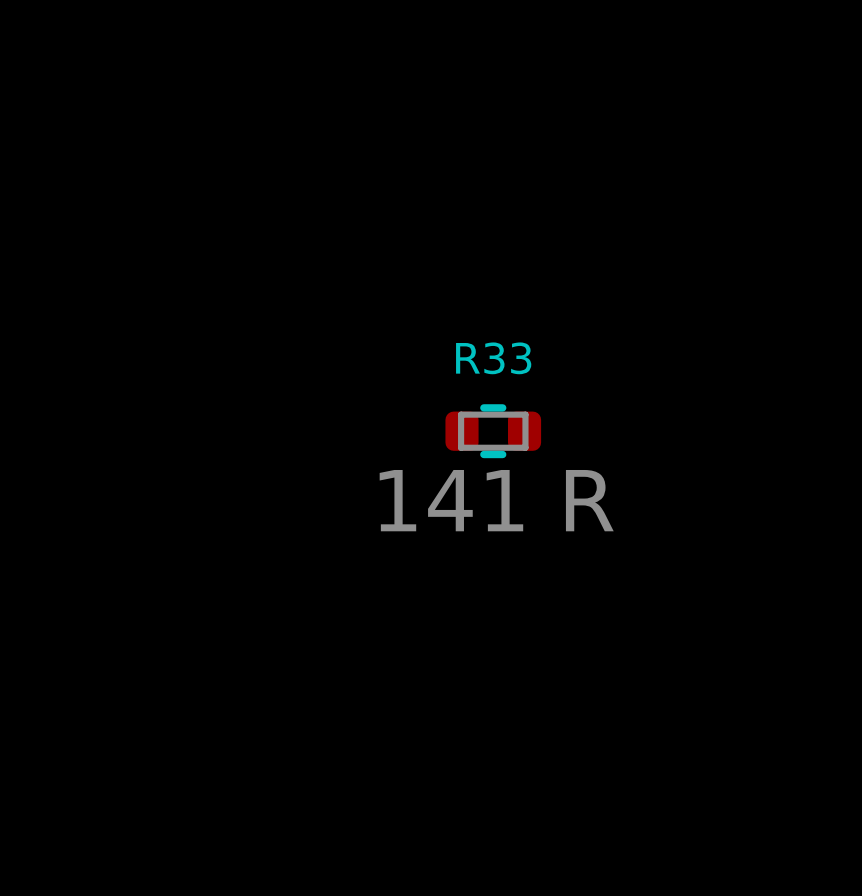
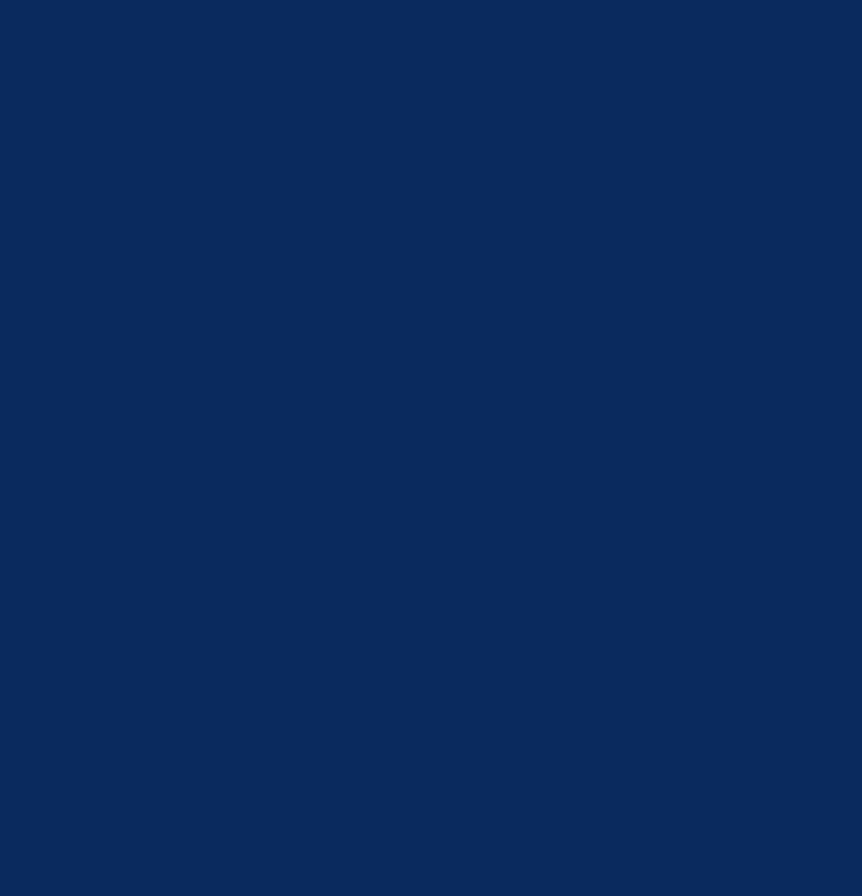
R33: 141 R (493, 431) -> none

